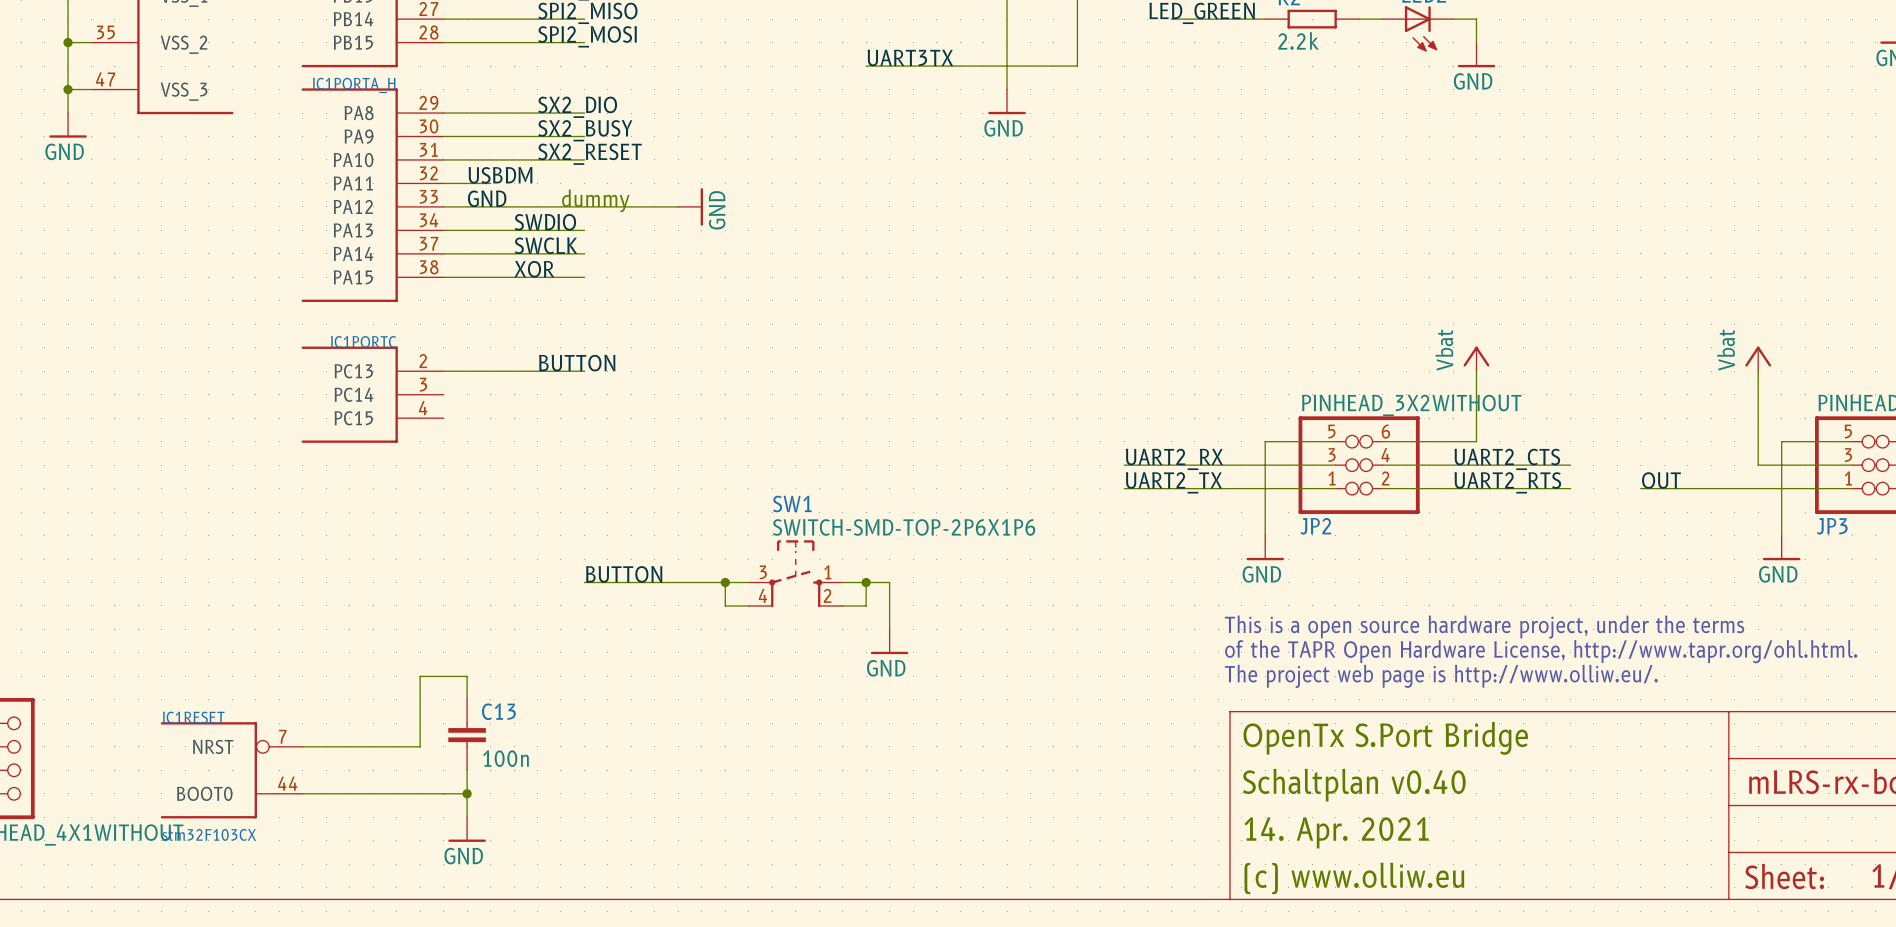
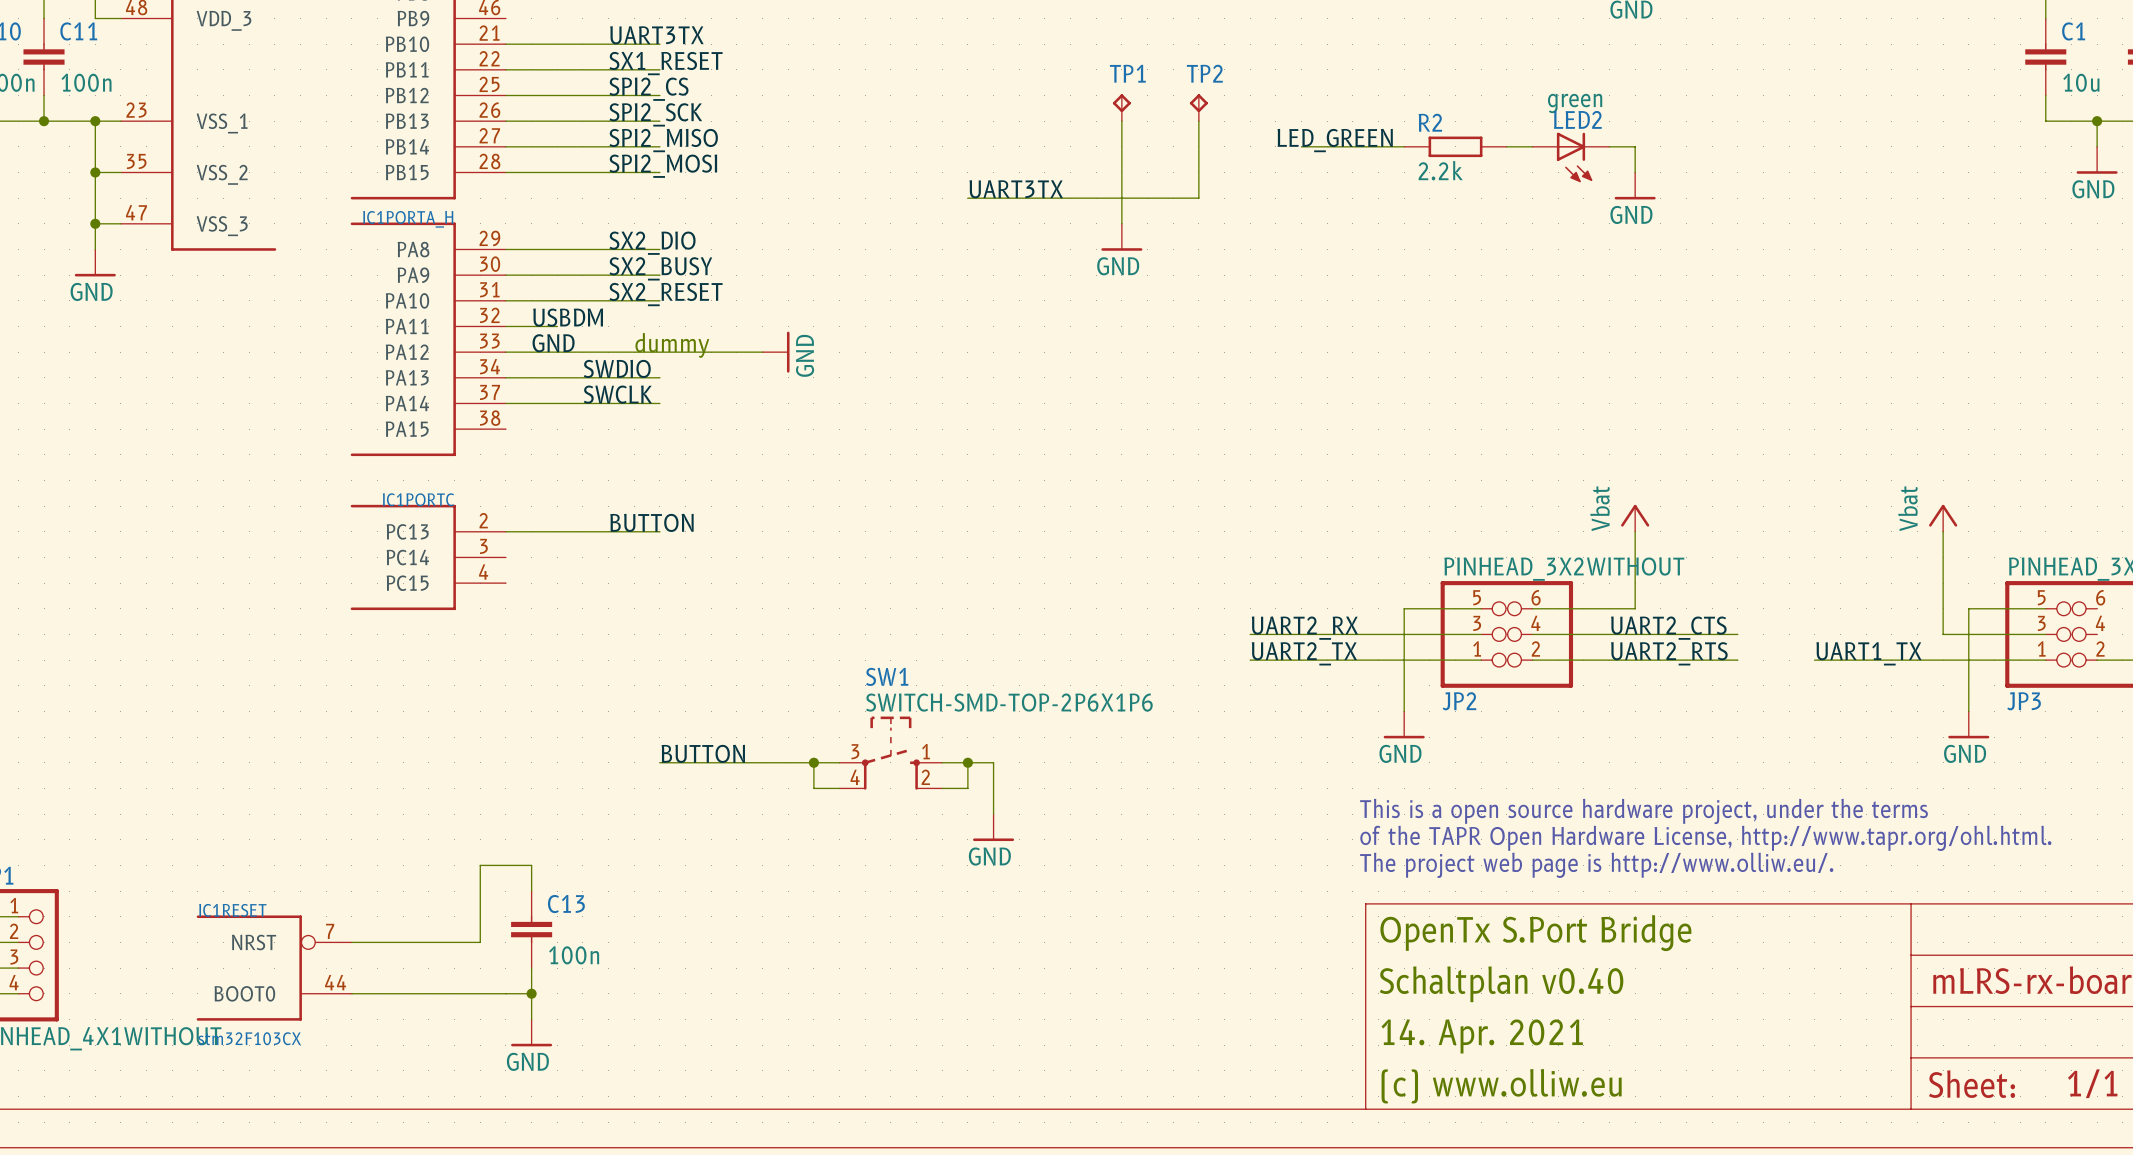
label: XOR (534, 269) -> none
wire: (443, 277) (584, 277) -> none
label: OUT (1661, 480) -> UART1_TX (1868, 653)

